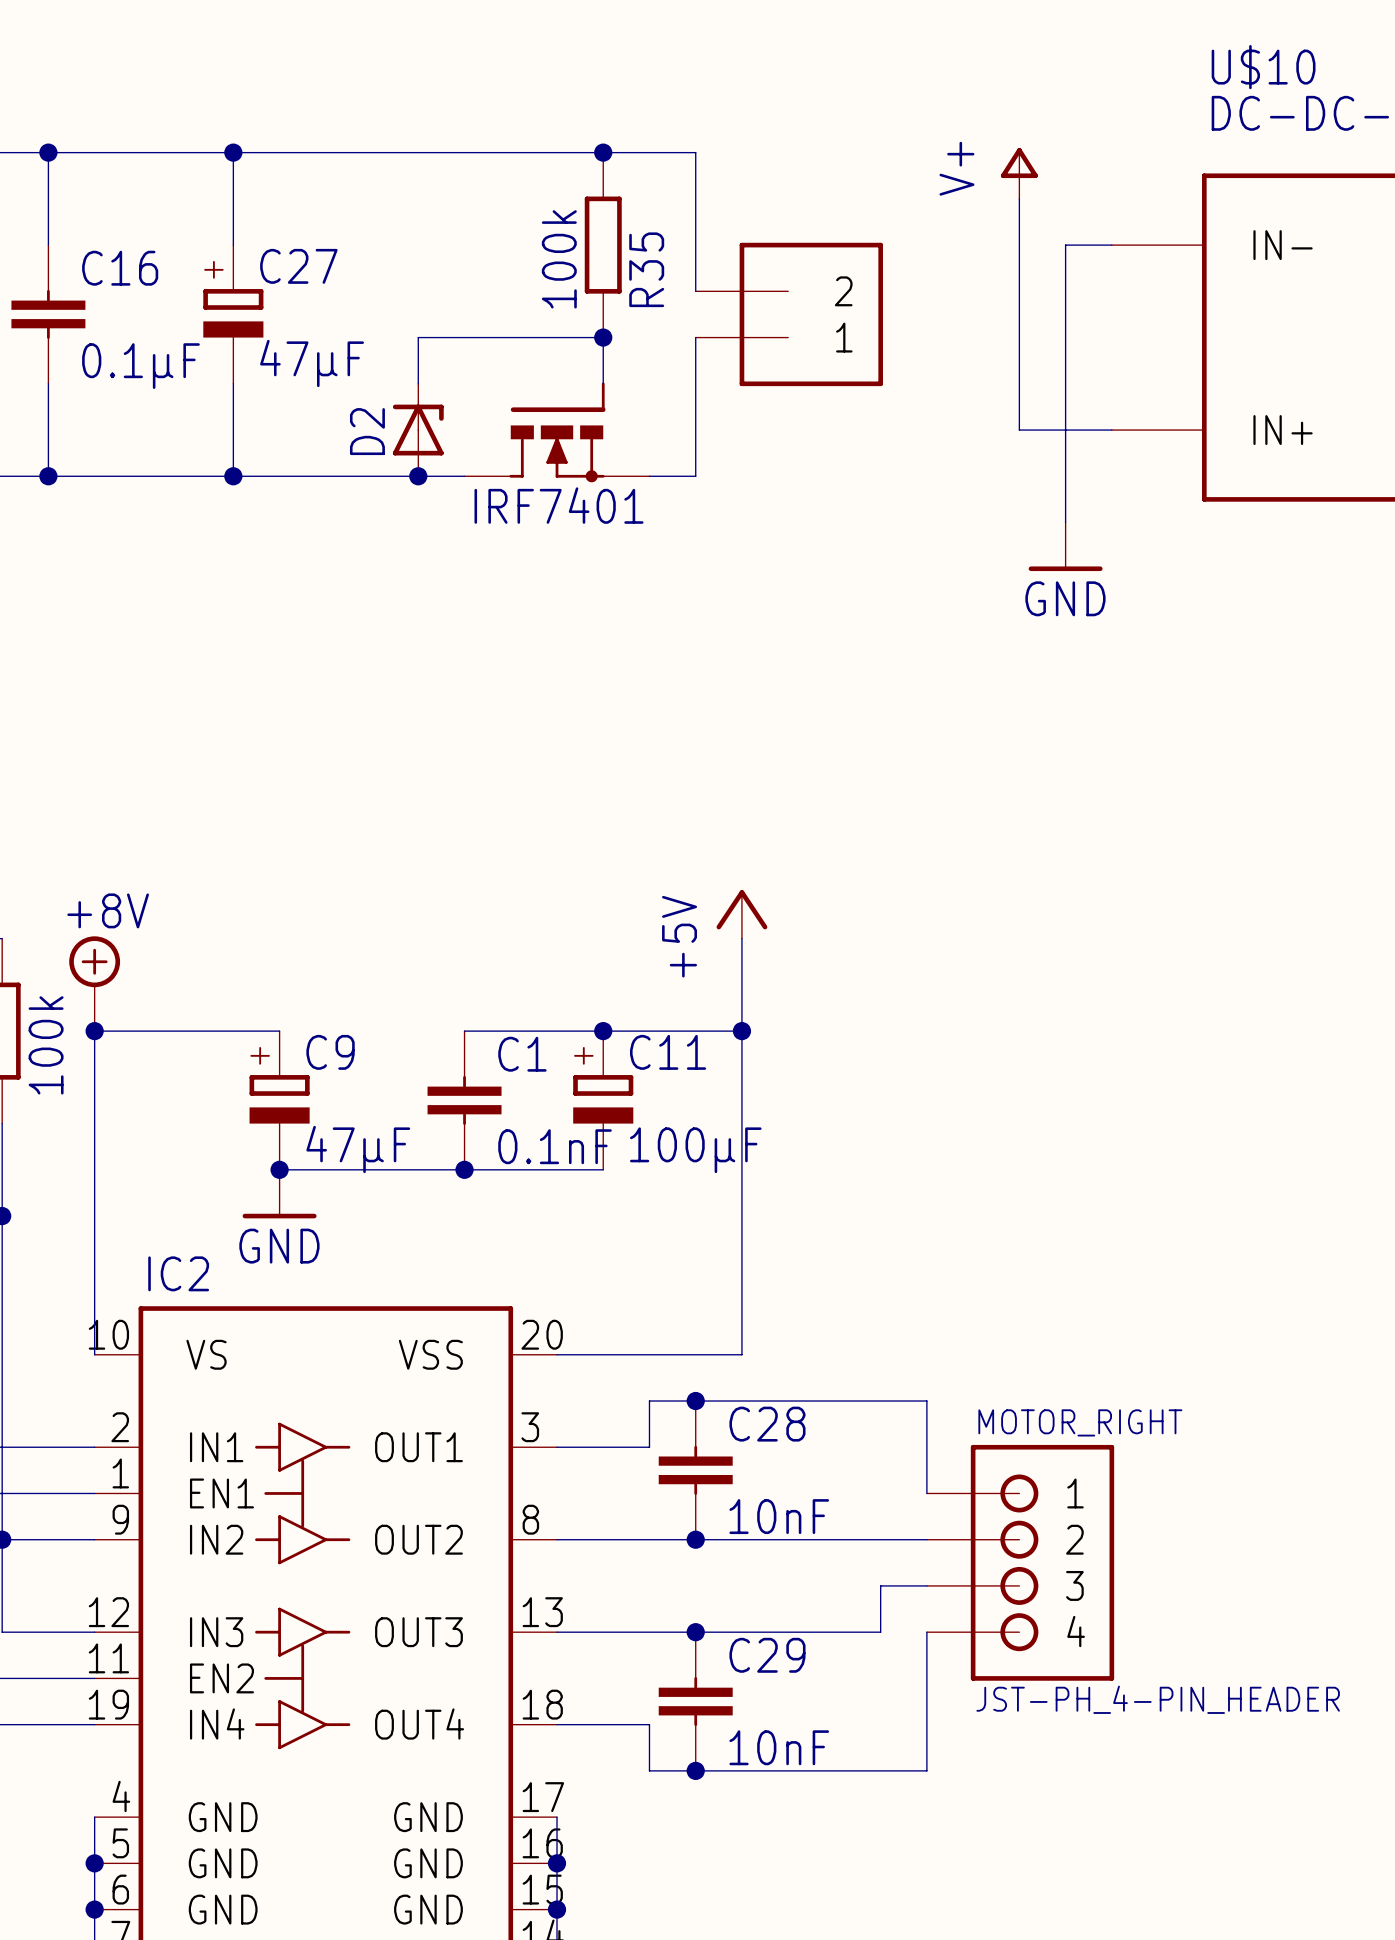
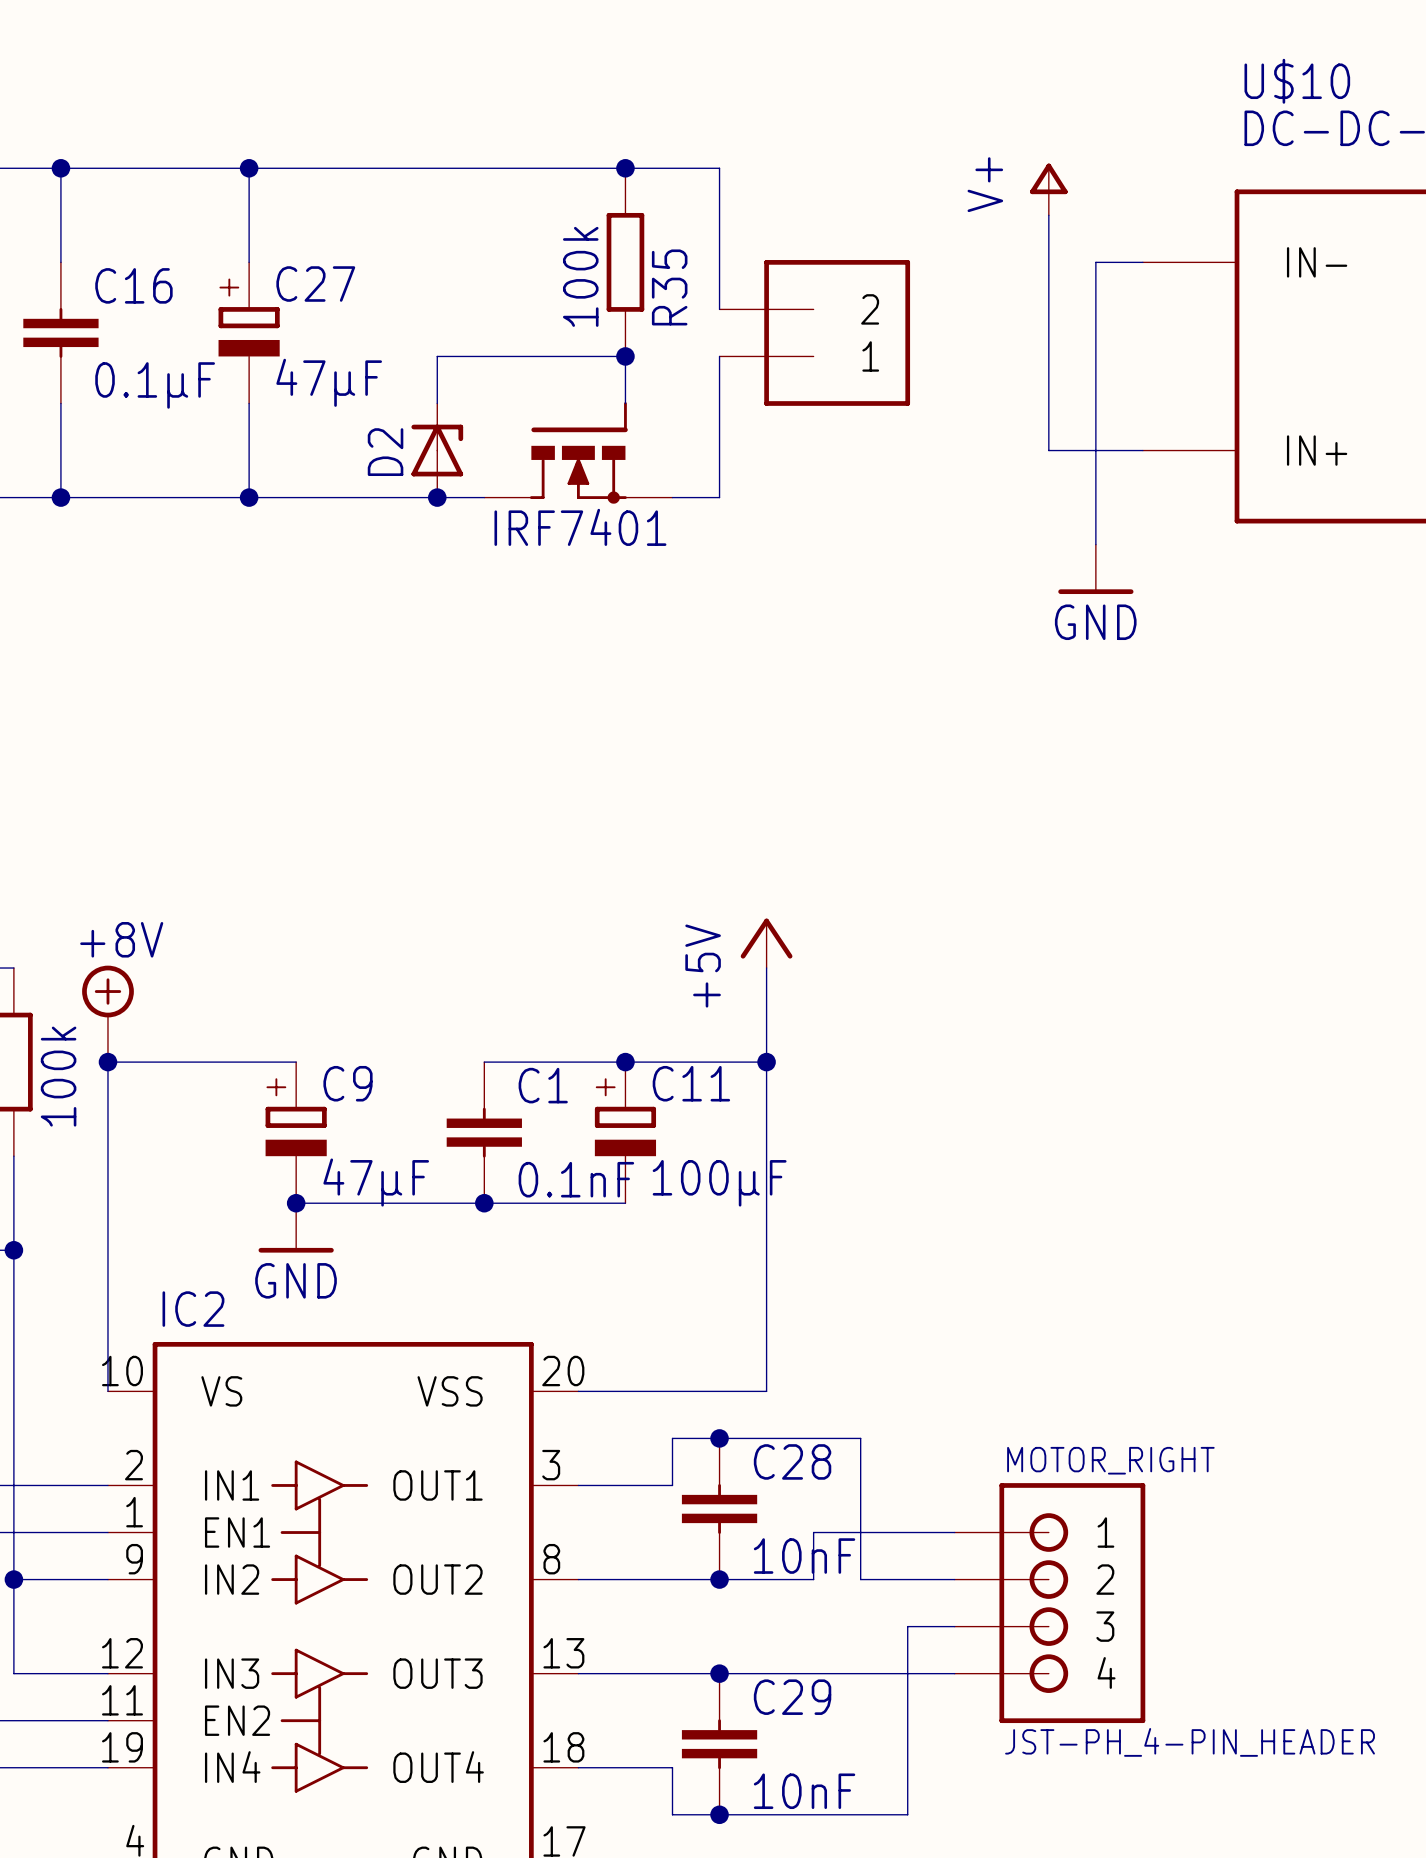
wire: (834, 1401) (926, 1401) (926, 1493) -> (860, 1438) (860, 1579)
wire: (788, 1539) (834, 1539) -> (813, 1579) (813, 1532) (954, 1532)
wire: (926, 1632) (926, 1770) (880, 1770) -> (954, 1673) (907, 1673) (907, 1814)

